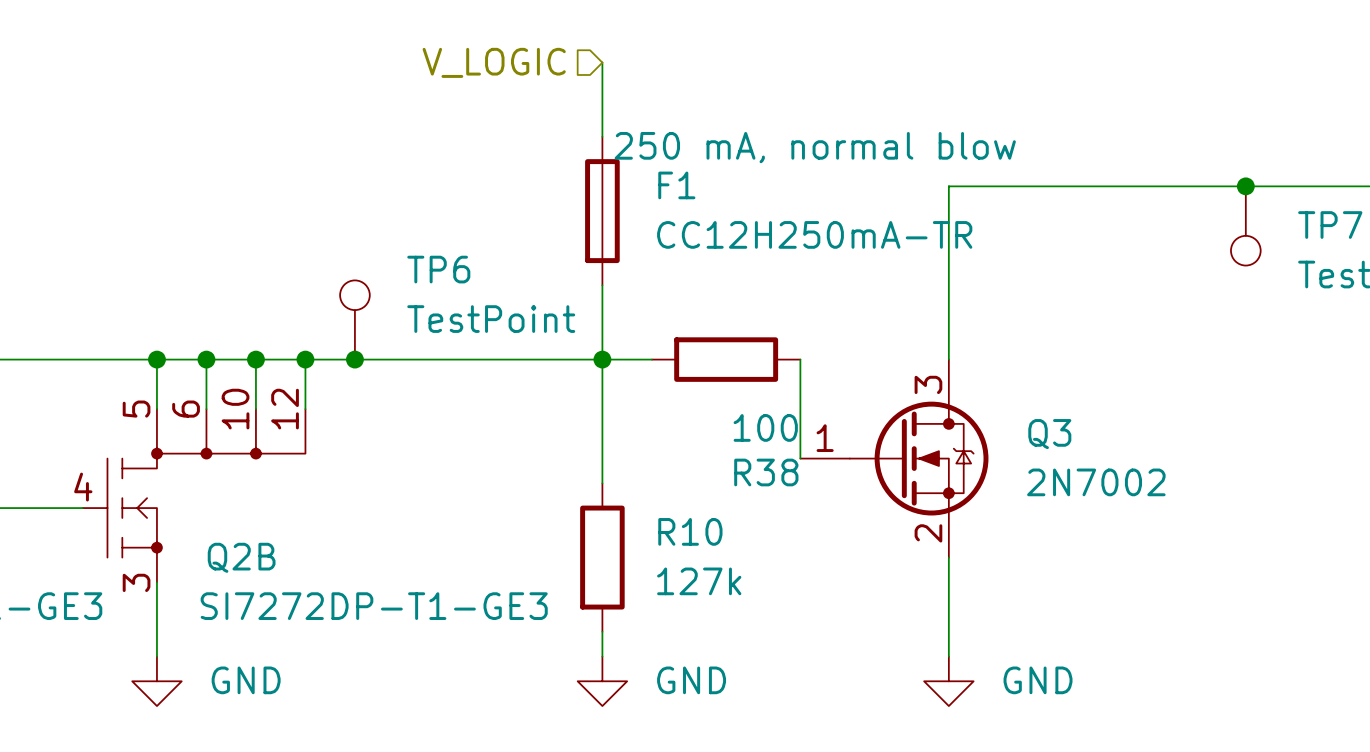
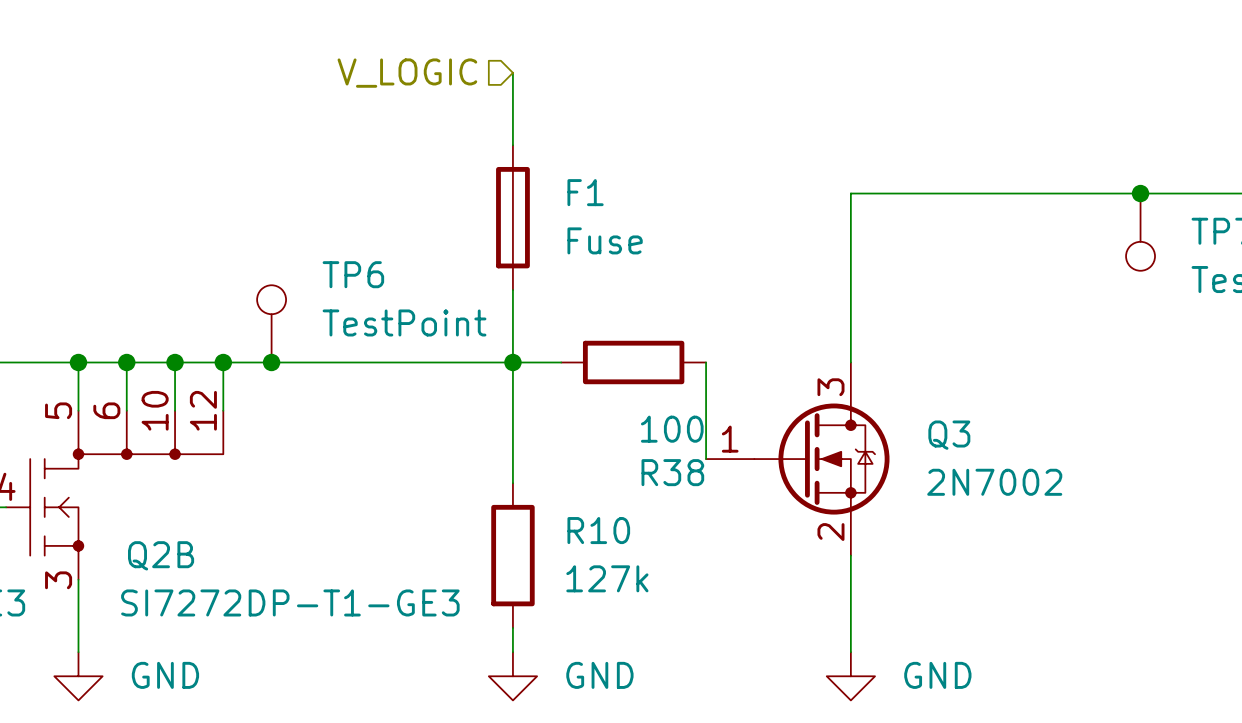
F1 text: 250 mA, normal blow (815, 147) -> none
F1 value: CC12H250mA-TR (814, 234) -> Fuse (605, 240)

